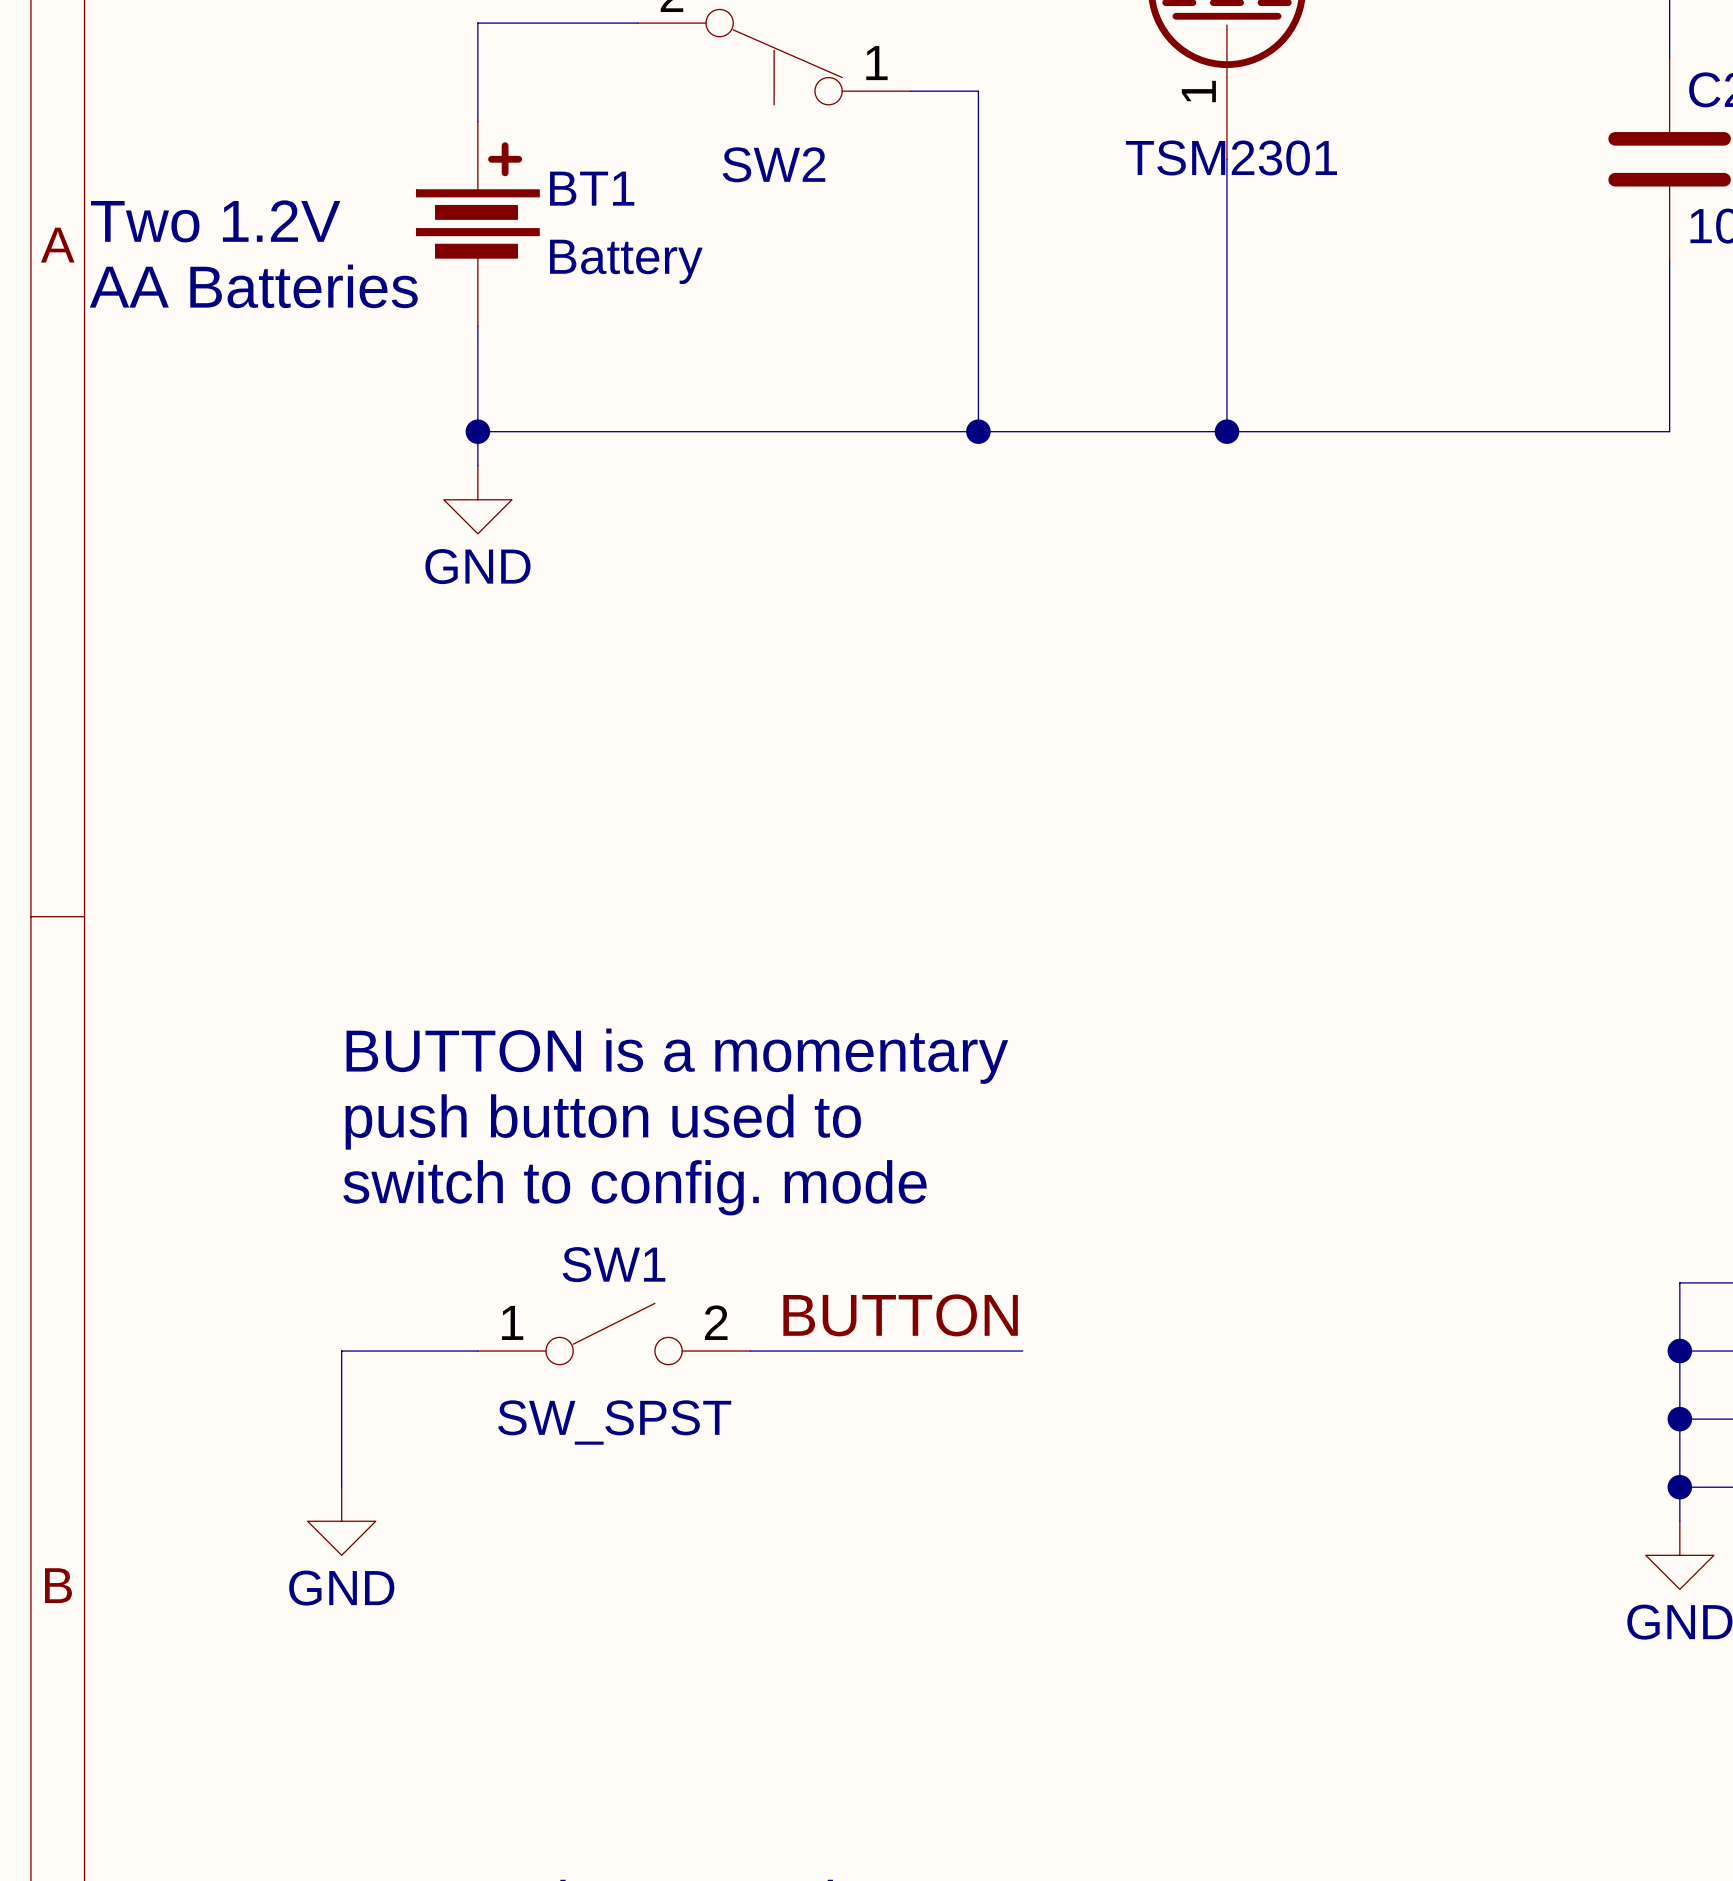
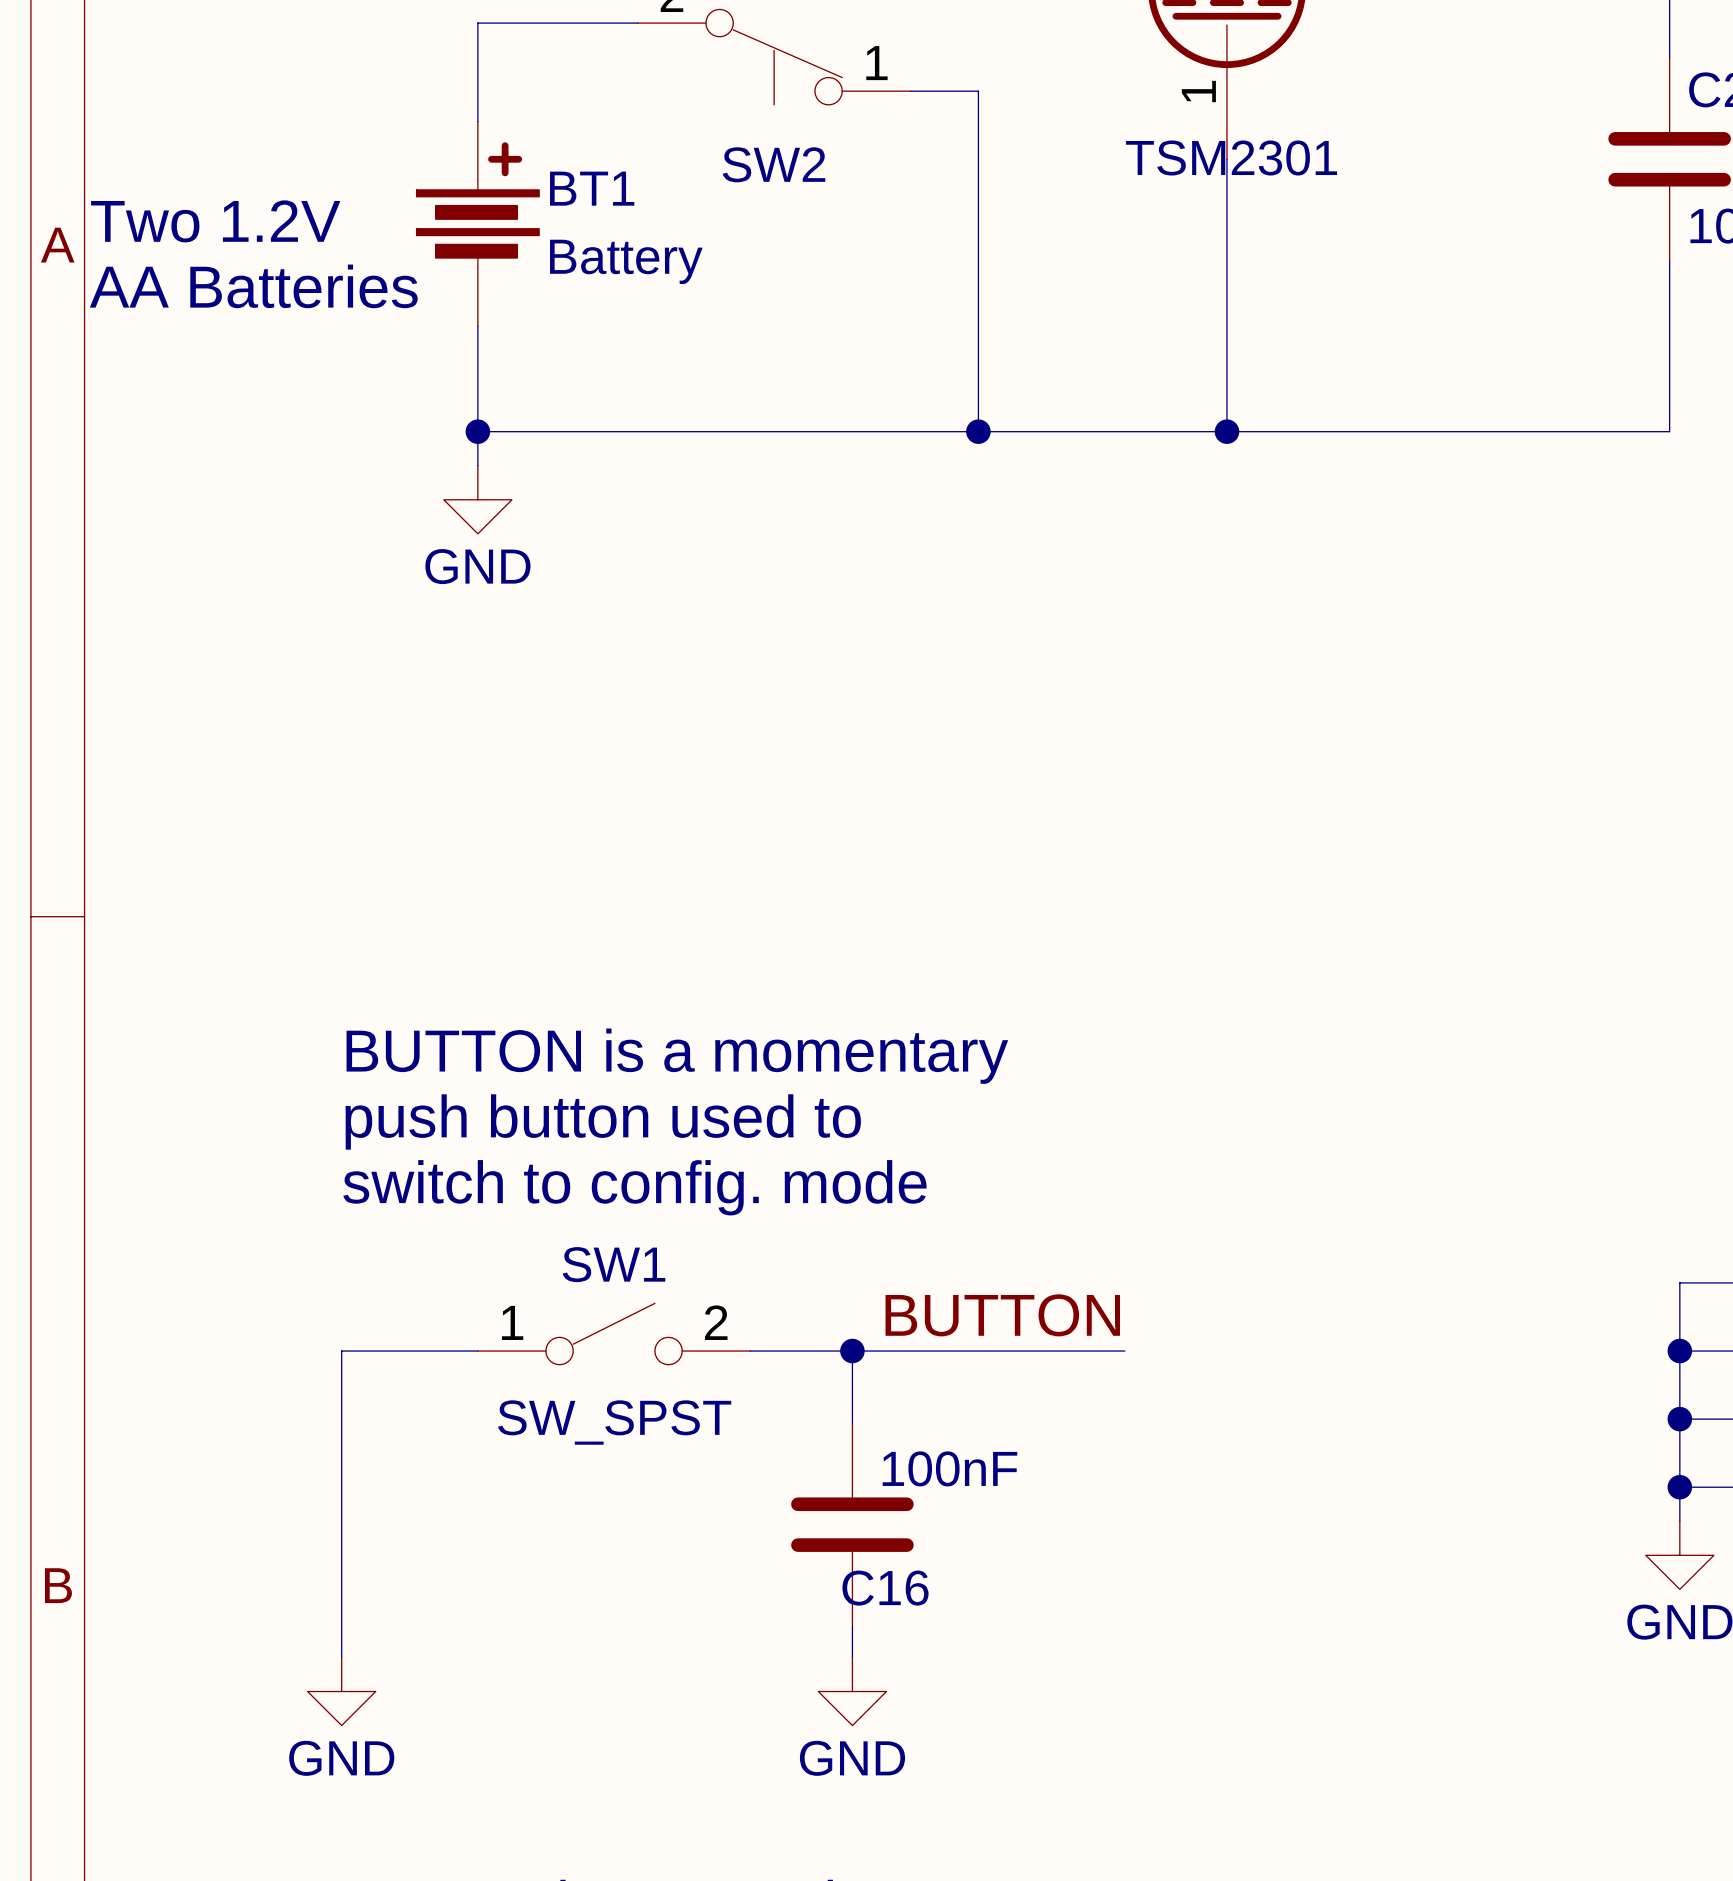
label position: BUTTON (900, 1315) -> BUTTON (1002, 1315)
wire: none -> (852, 1351) (852, 1422)
junction: none -> (852, 1351)
wire: none -> (1022, 1351) (1124, 1351)
wire: none -> (341, 1487) (341, 1657)
power symbol position: GND (341, 1521) -> GND (341, 1691)
C16: none -> 100nF (852, 1524)
wire: none -> (852, 1626) (852, 1657)
power symbol: none -> GND (852, 1691)

